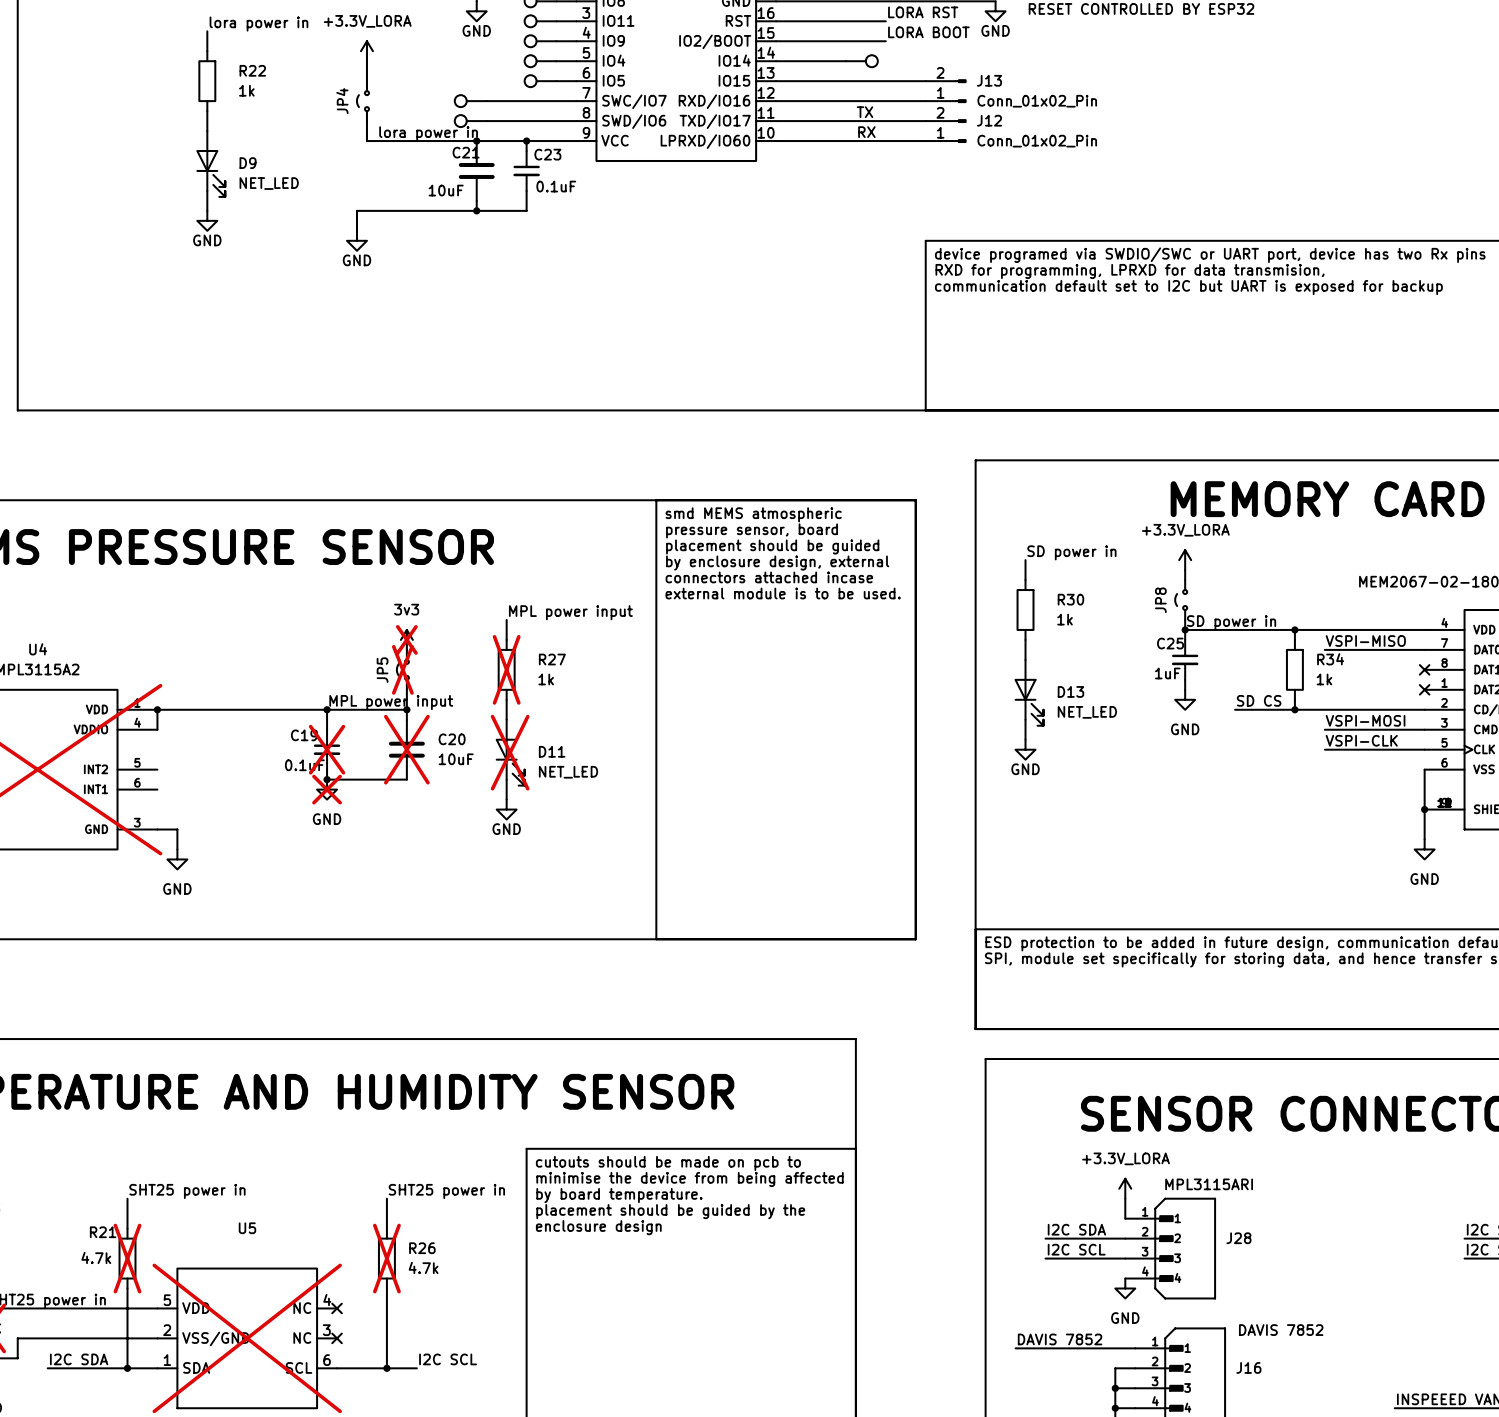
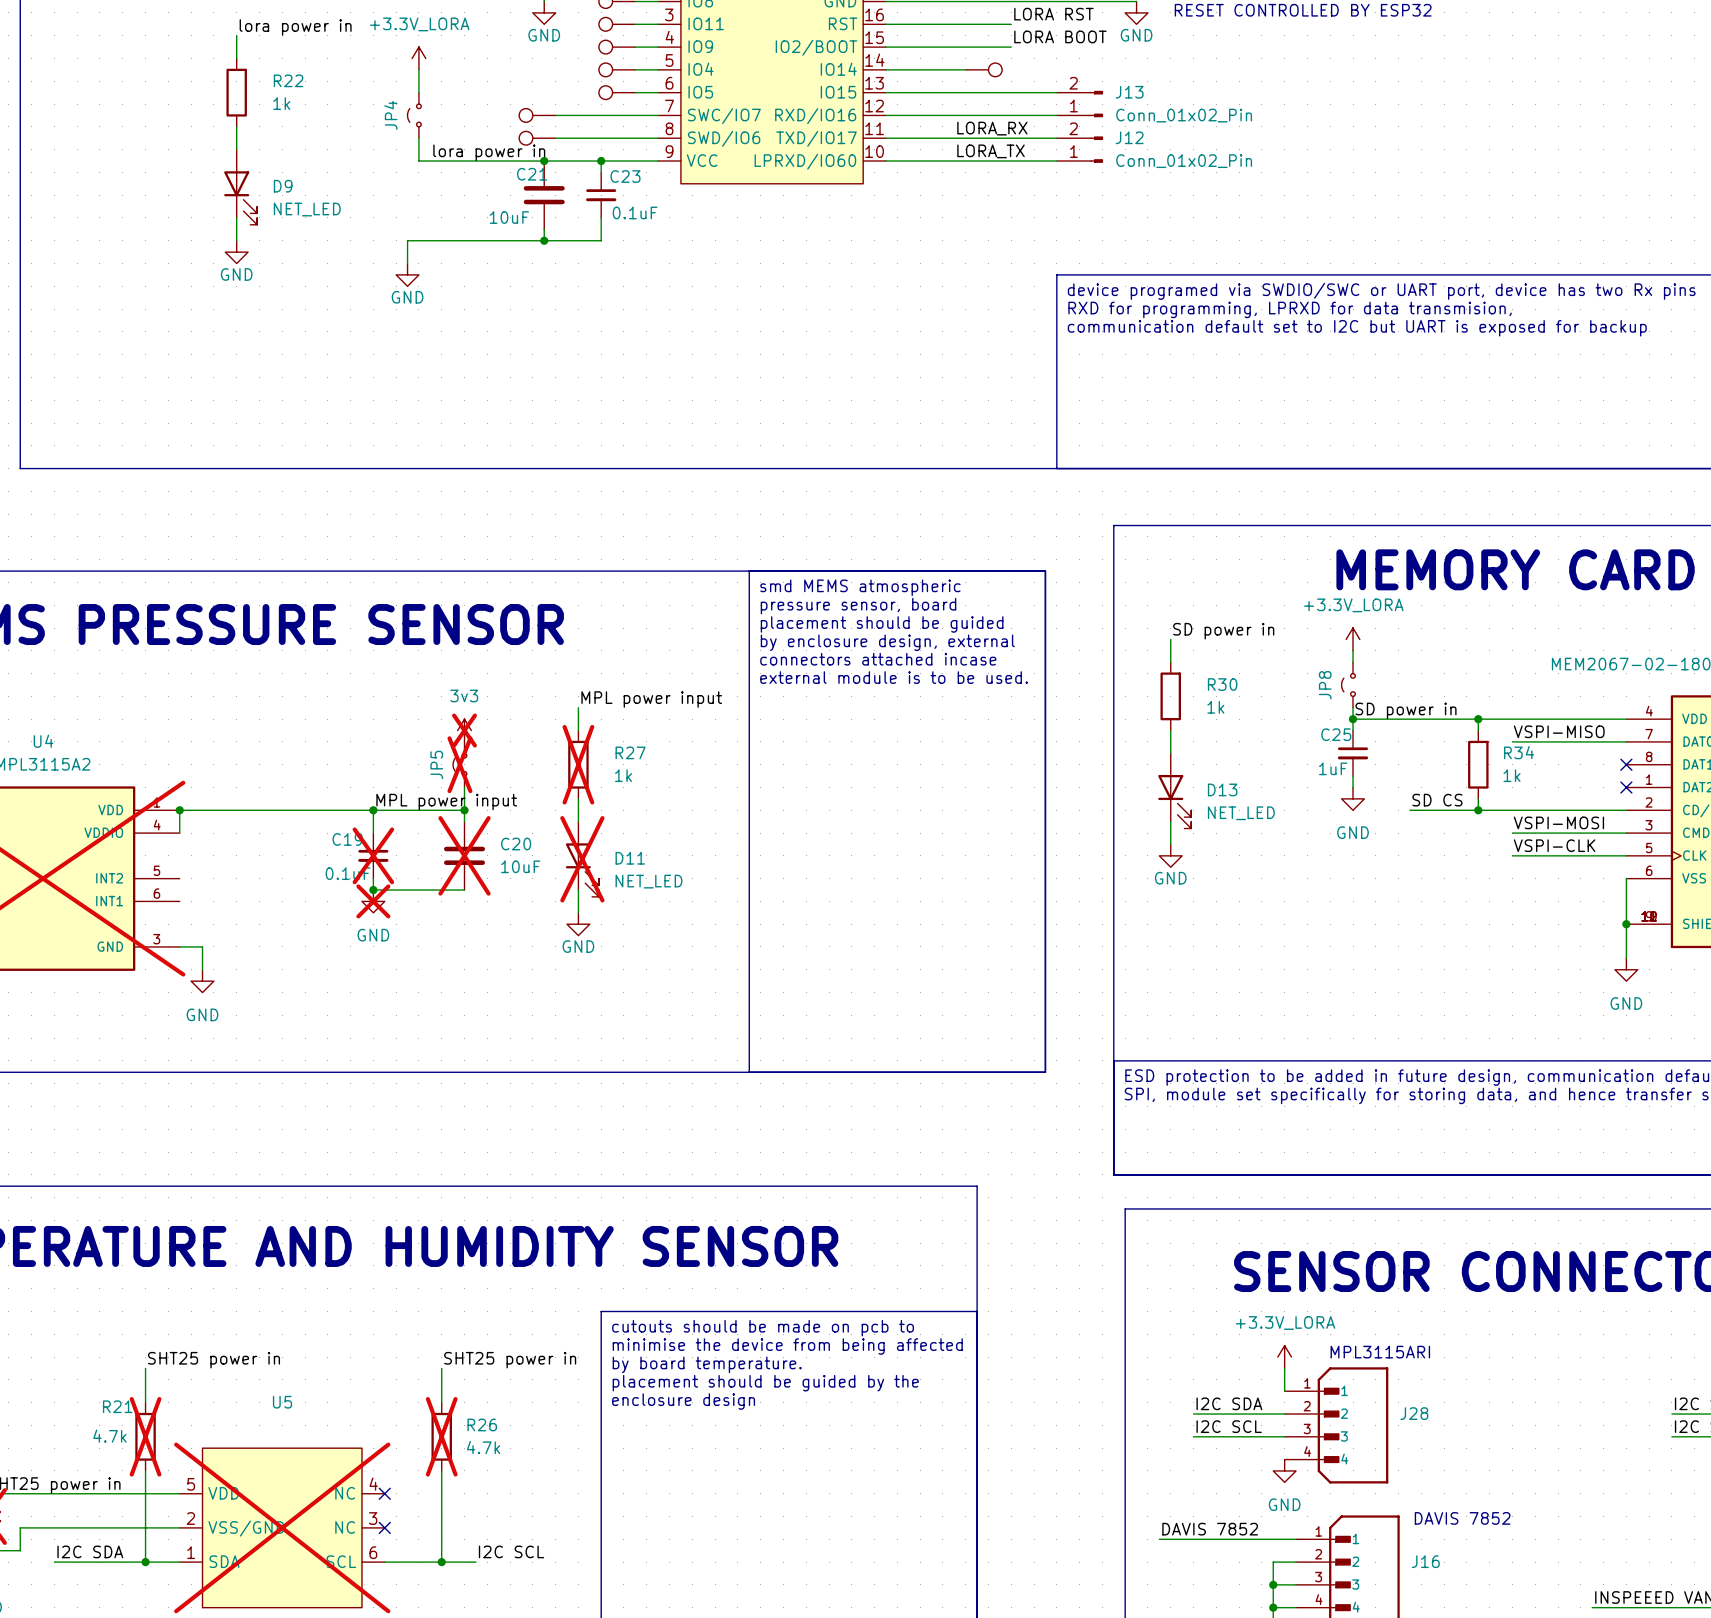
label: TX (864, 112) -> none
label: none -> LORA_RX (992, 128)
label: RX (866, 132) -> none
label: none -> LORA_TX (991, 151)

